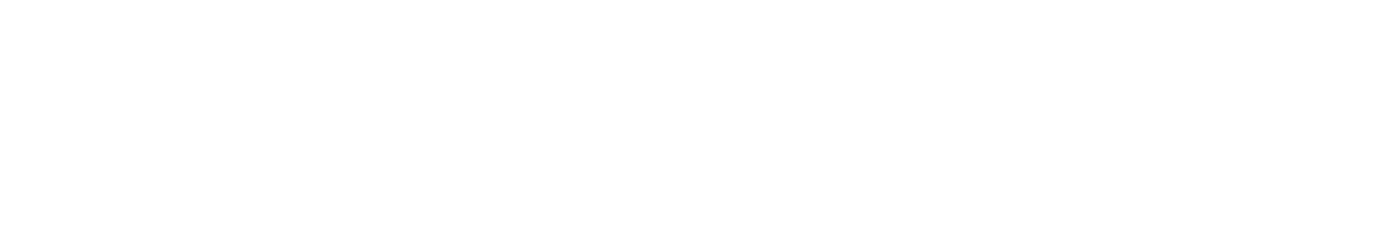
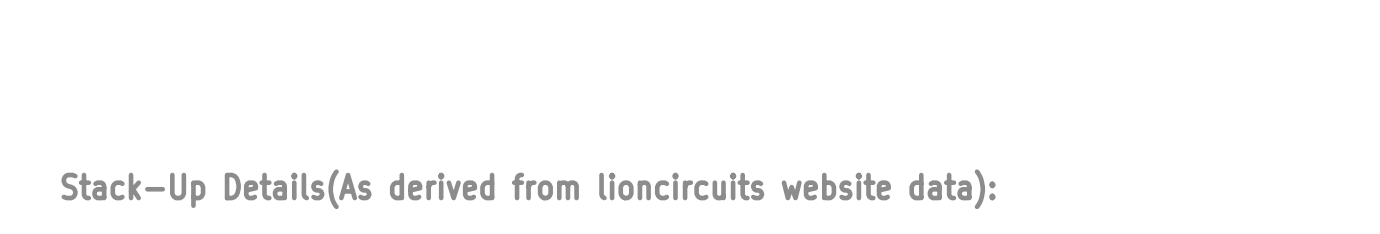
text: none -> Stack-Up Details(As derived from lioncircuits website data): (528, 189)

